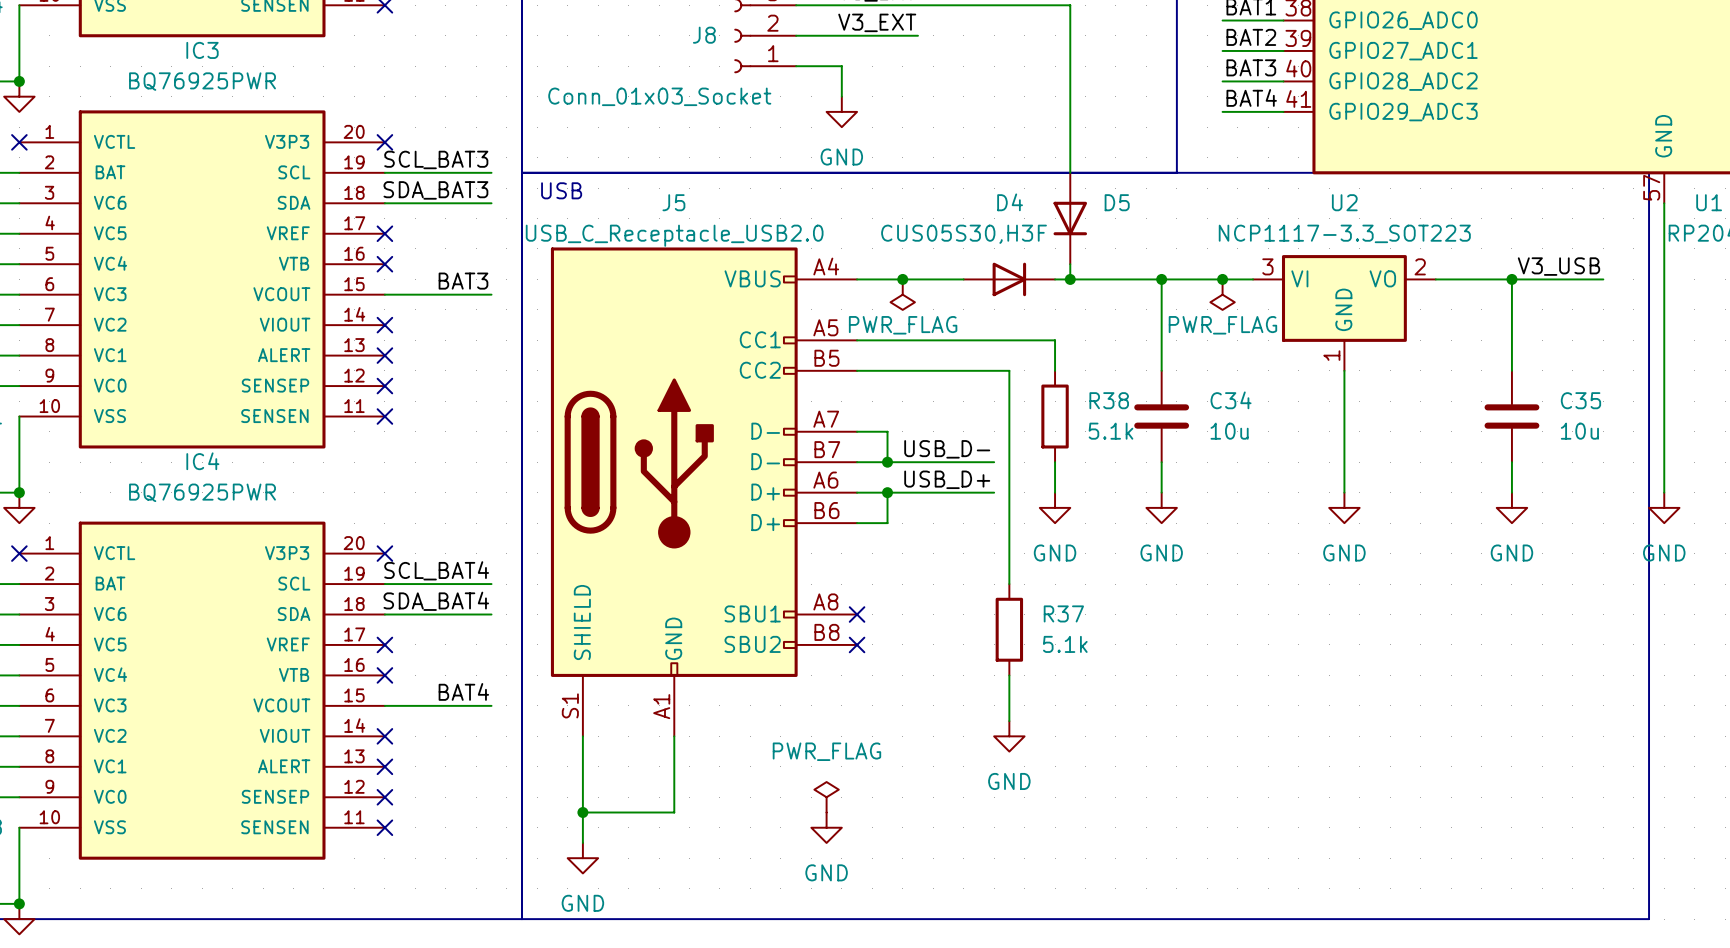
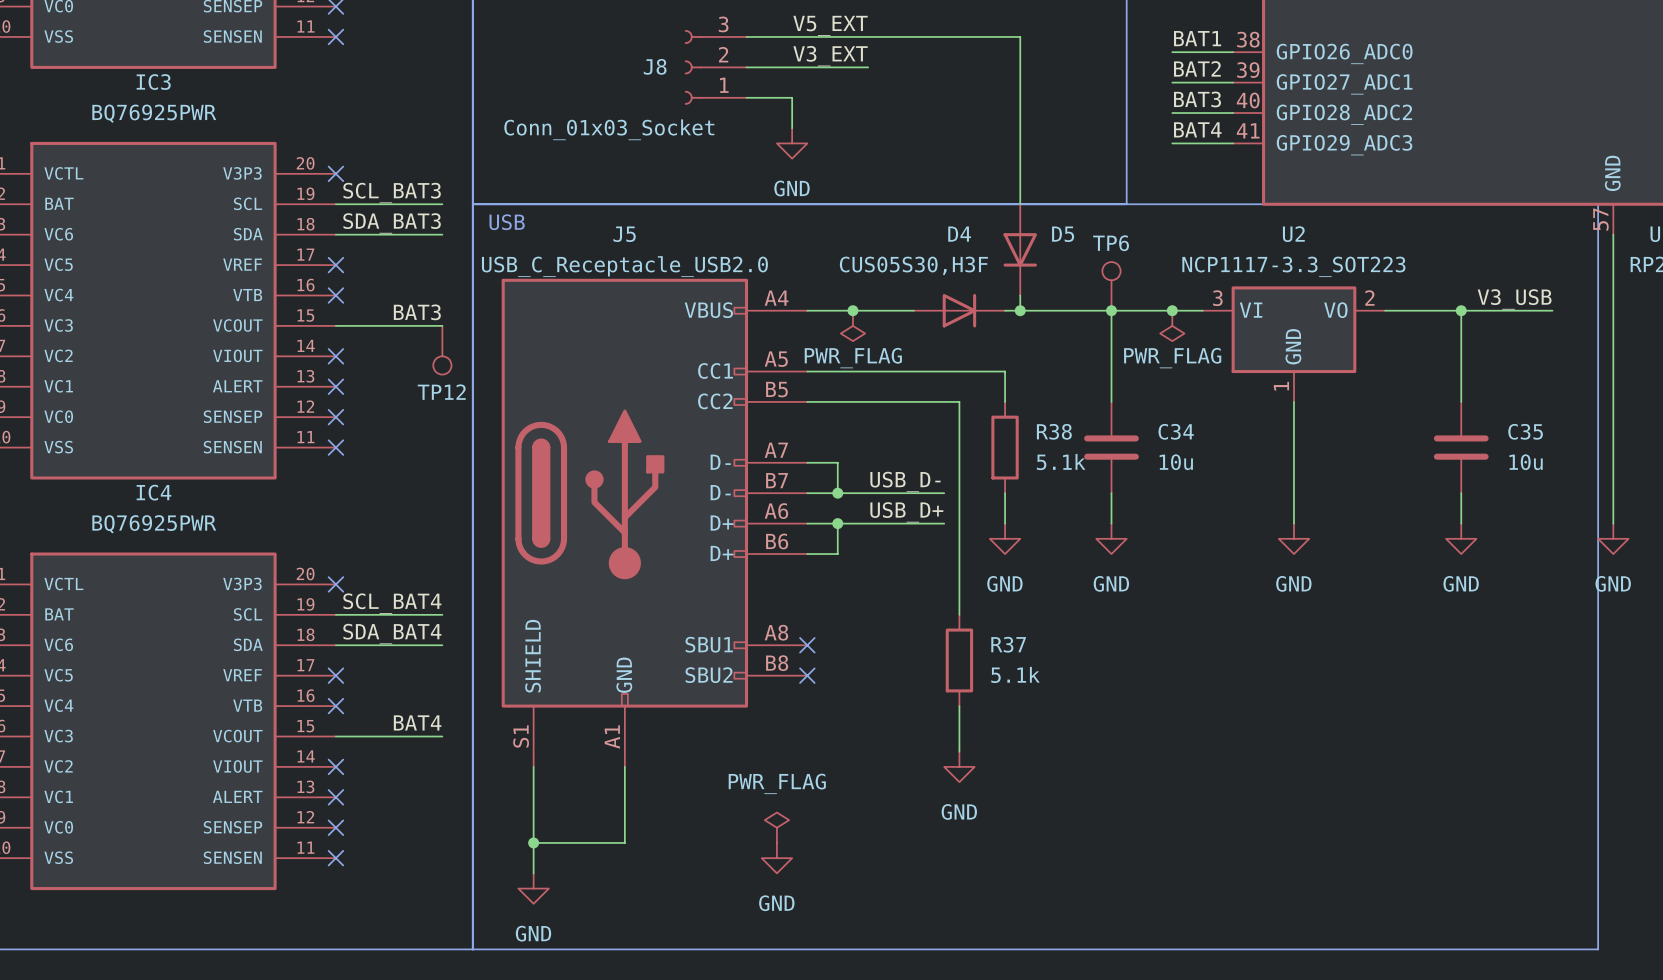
TP6: none -> (1111, 286)
TP12: none -> (442, 350)

